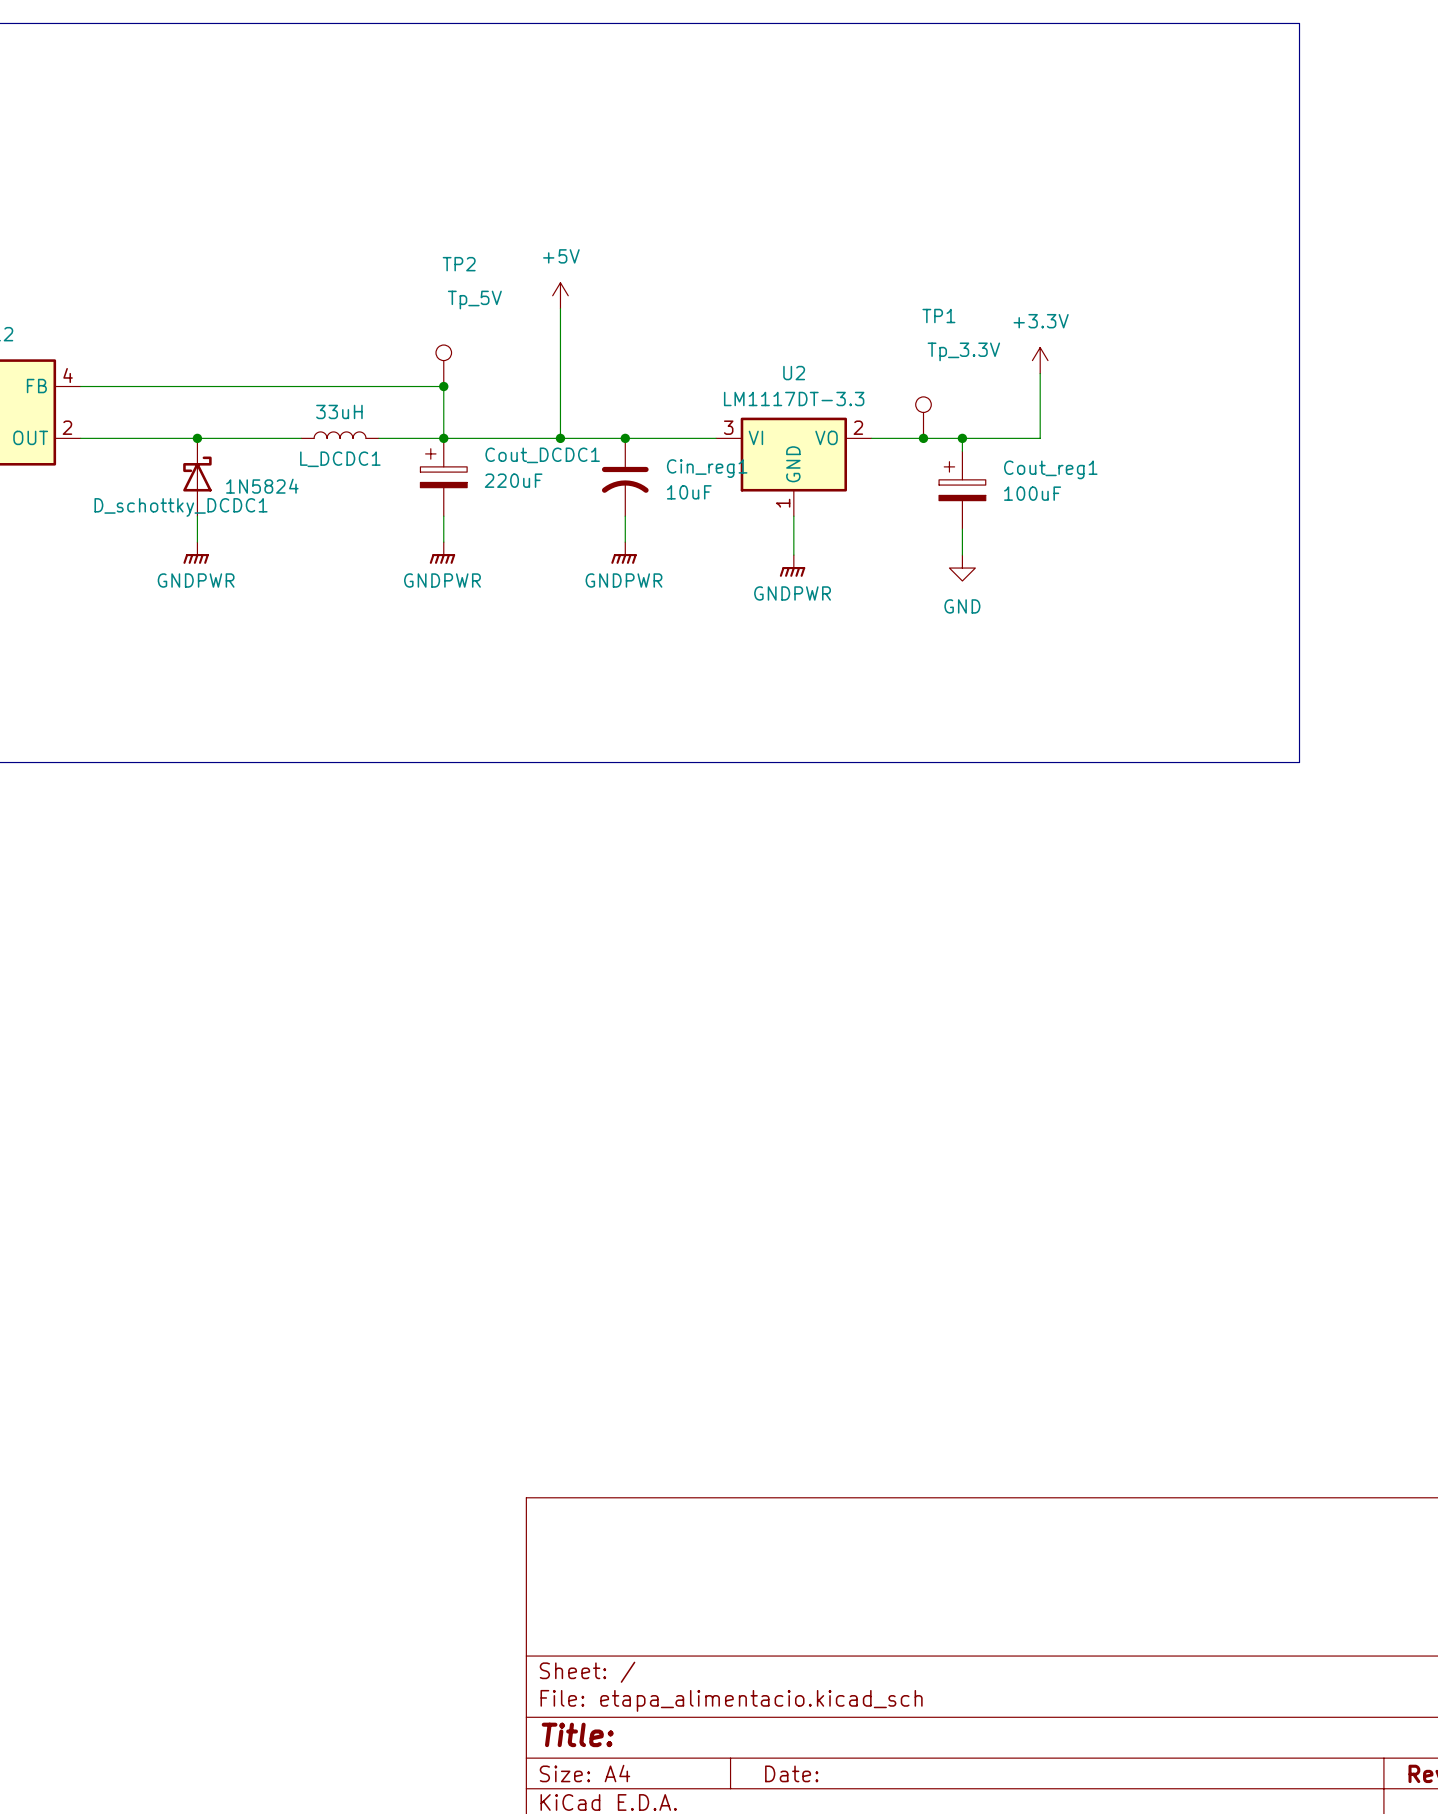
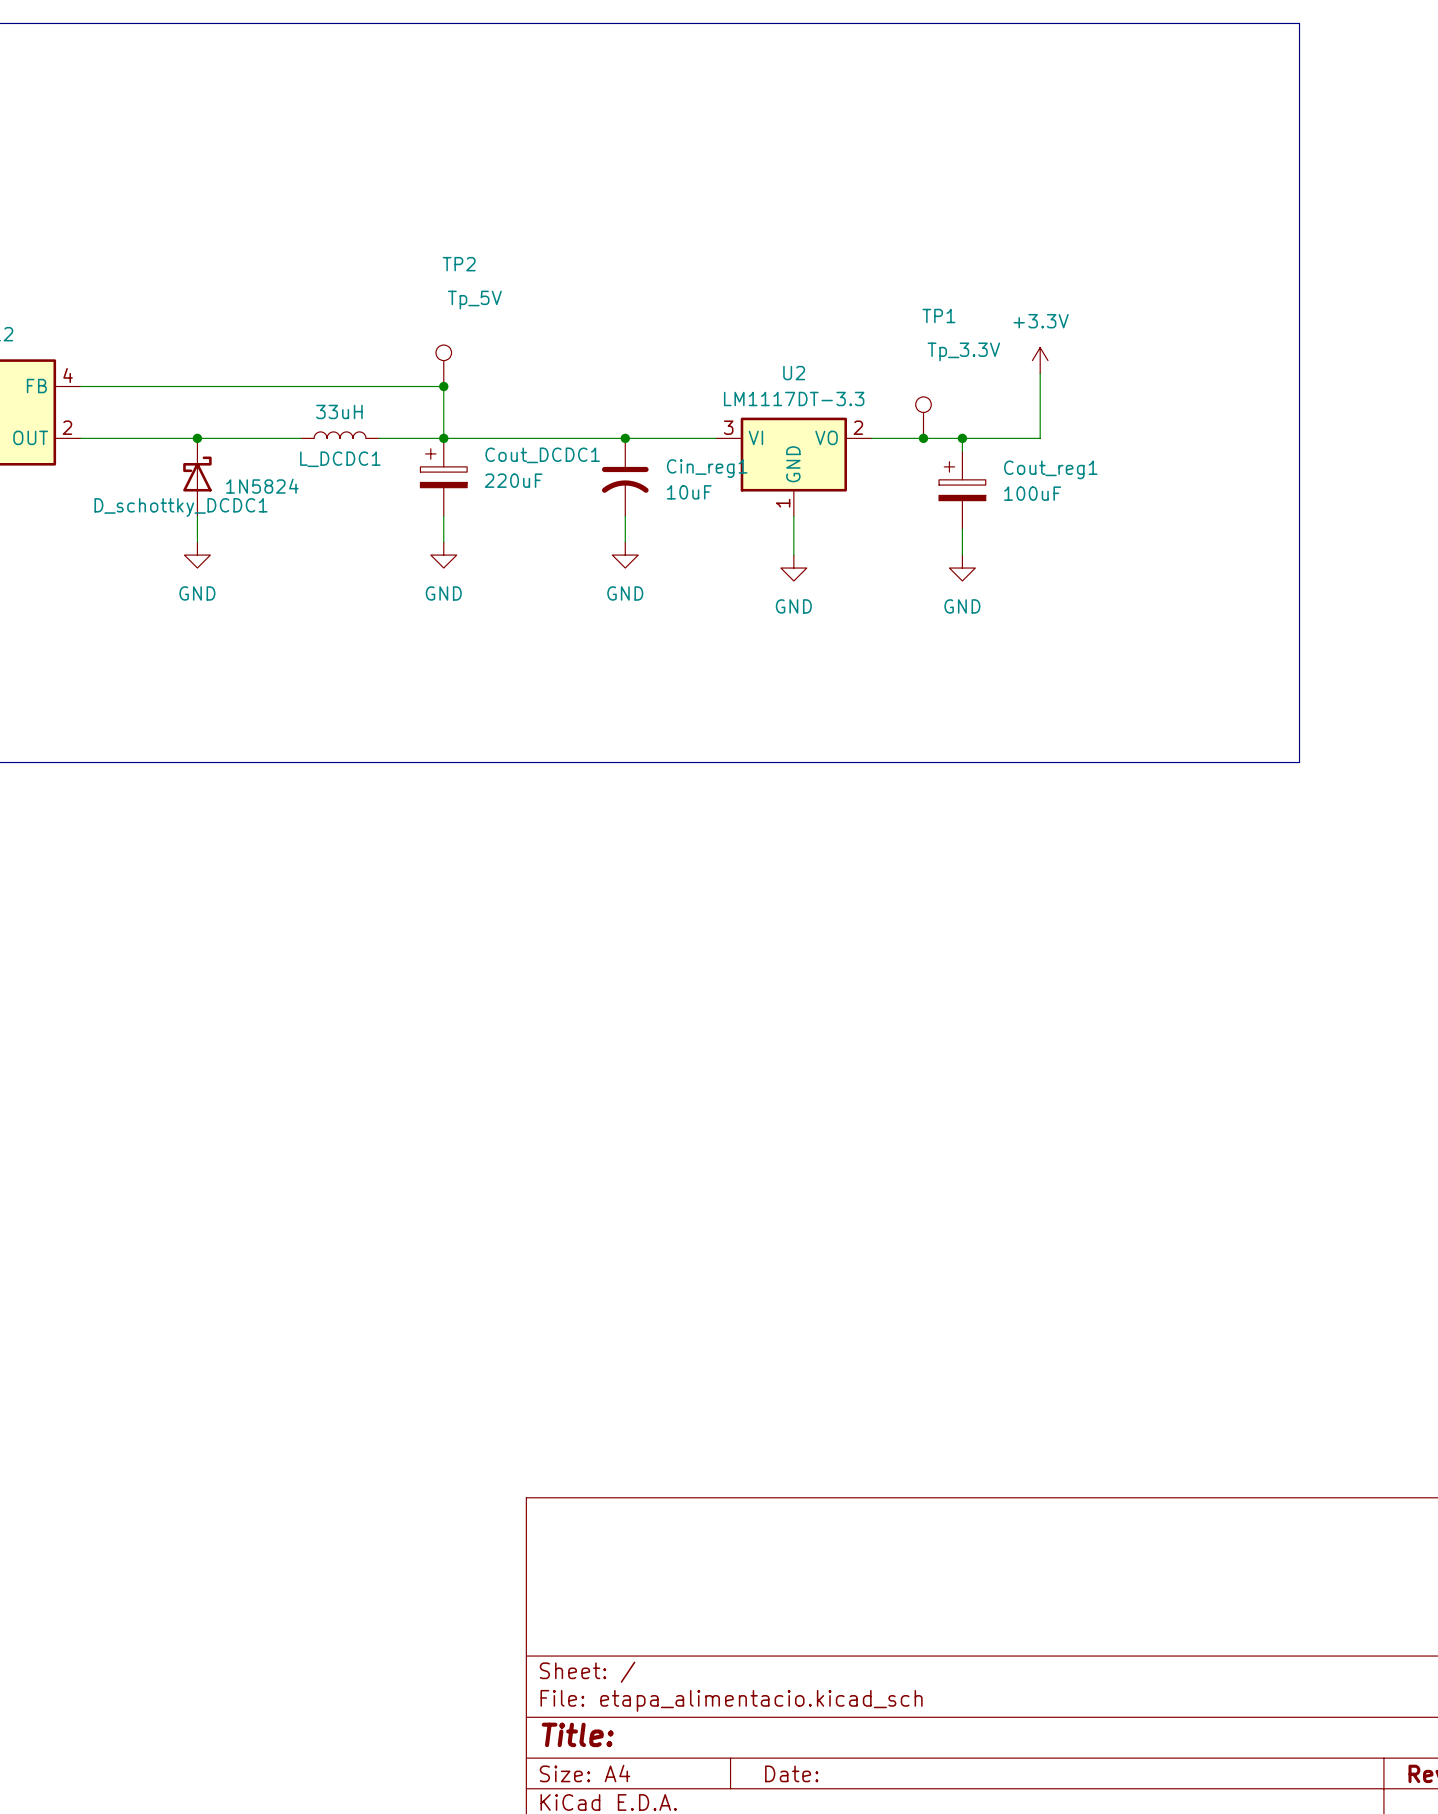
power symbol: +5V (560, 295) -> none
wire: (560, 308) (560, 438) -> none
junction: (560, 438) -> none
power symbol: GNDPWR (196, 552) -> GND (197, 555)
power symbol: GNDPWR (442, 552) -> GND (443, 555)
power symbol: GNDPWR (623, 552) -> GND (625, 555)
power symbol: GNDPWR (792, 565) -> GND (793, 568)

